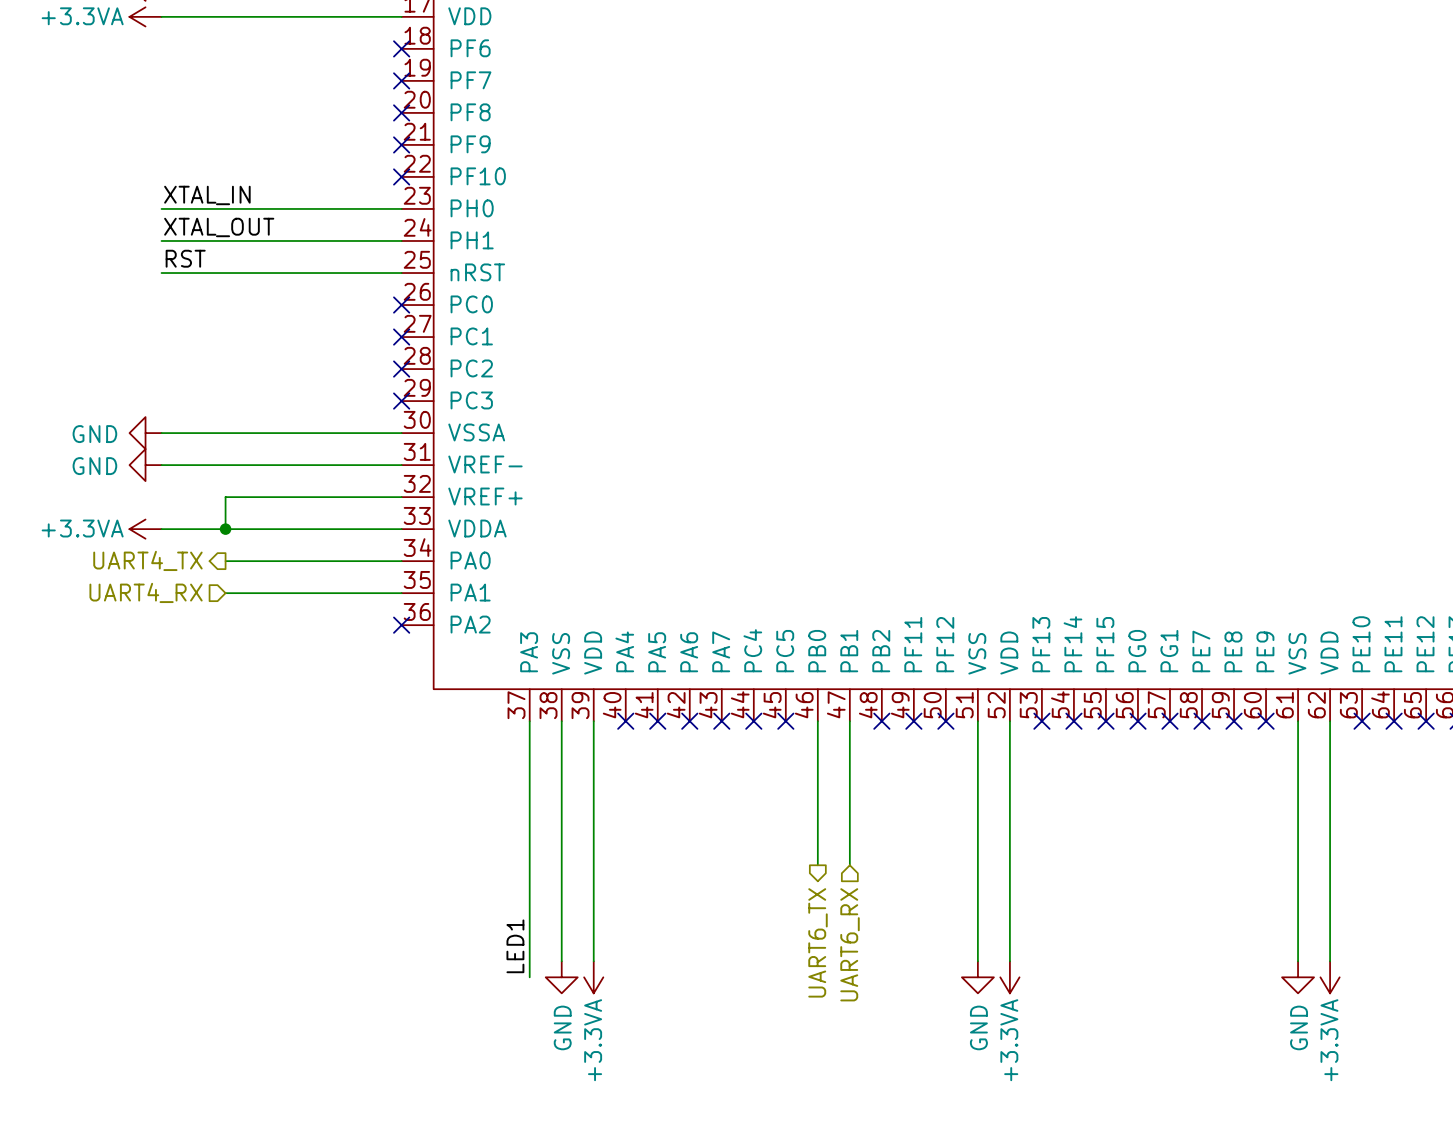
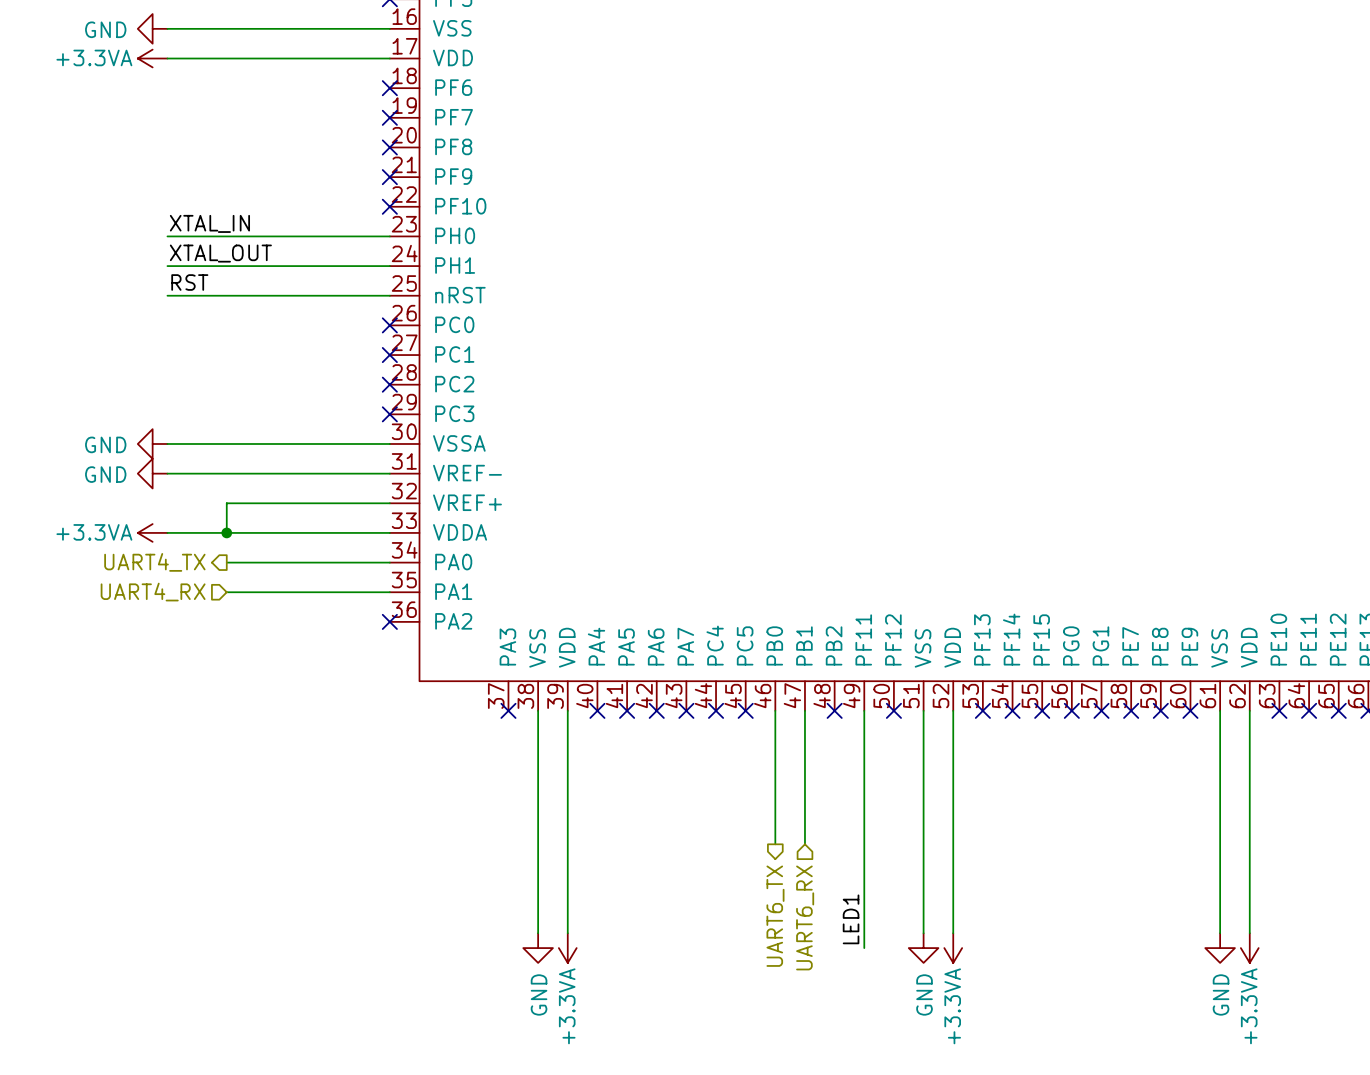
wire: (529, 721) (529, 977) -> none
no-connect mark: none -> (508, 710)
wire: none -> (864, 710) (864, 948)
no-connect mark: (913, 721) -> none
label: LED1 (515, 946) -> none
label: none -> LED1 (851, 919)

